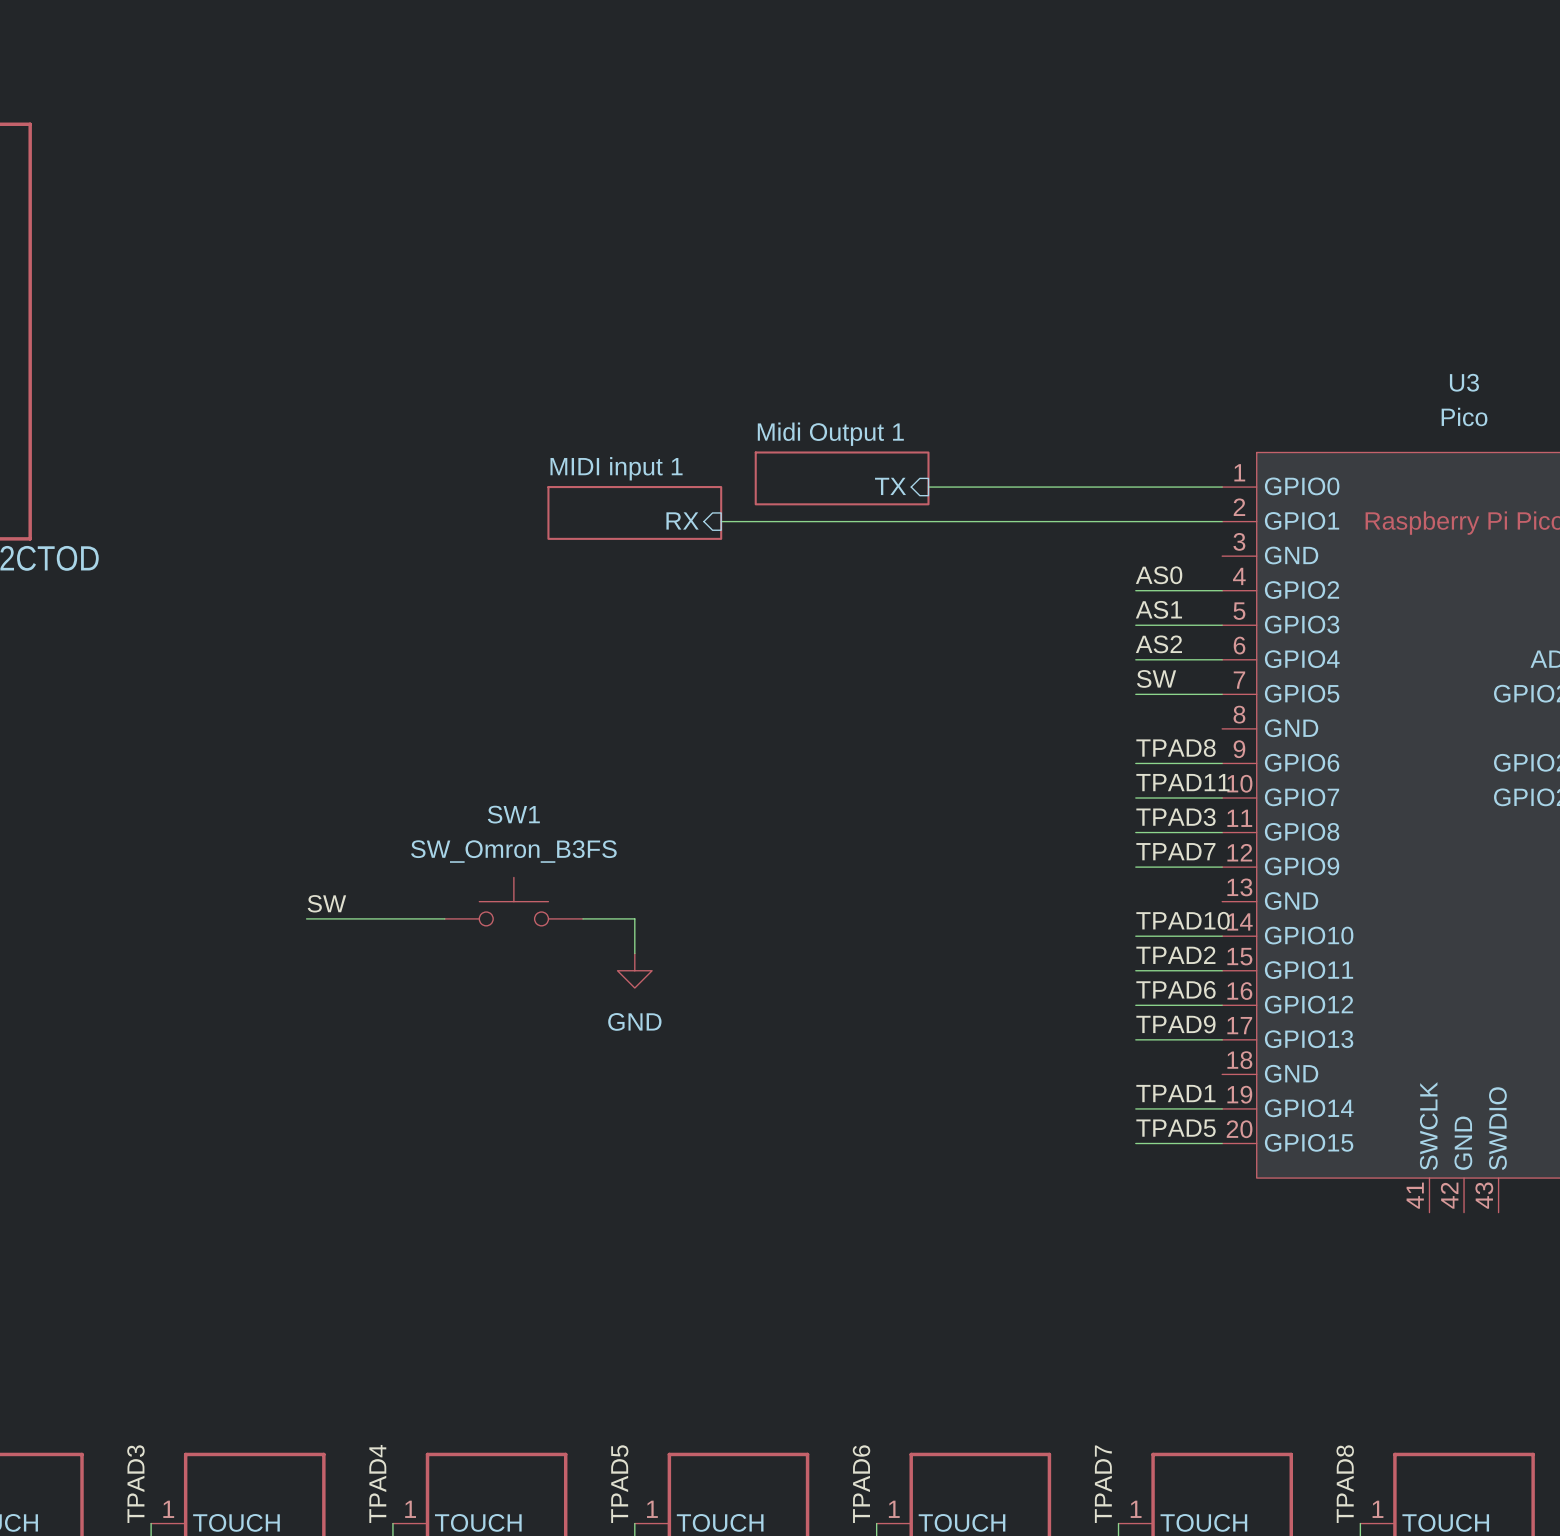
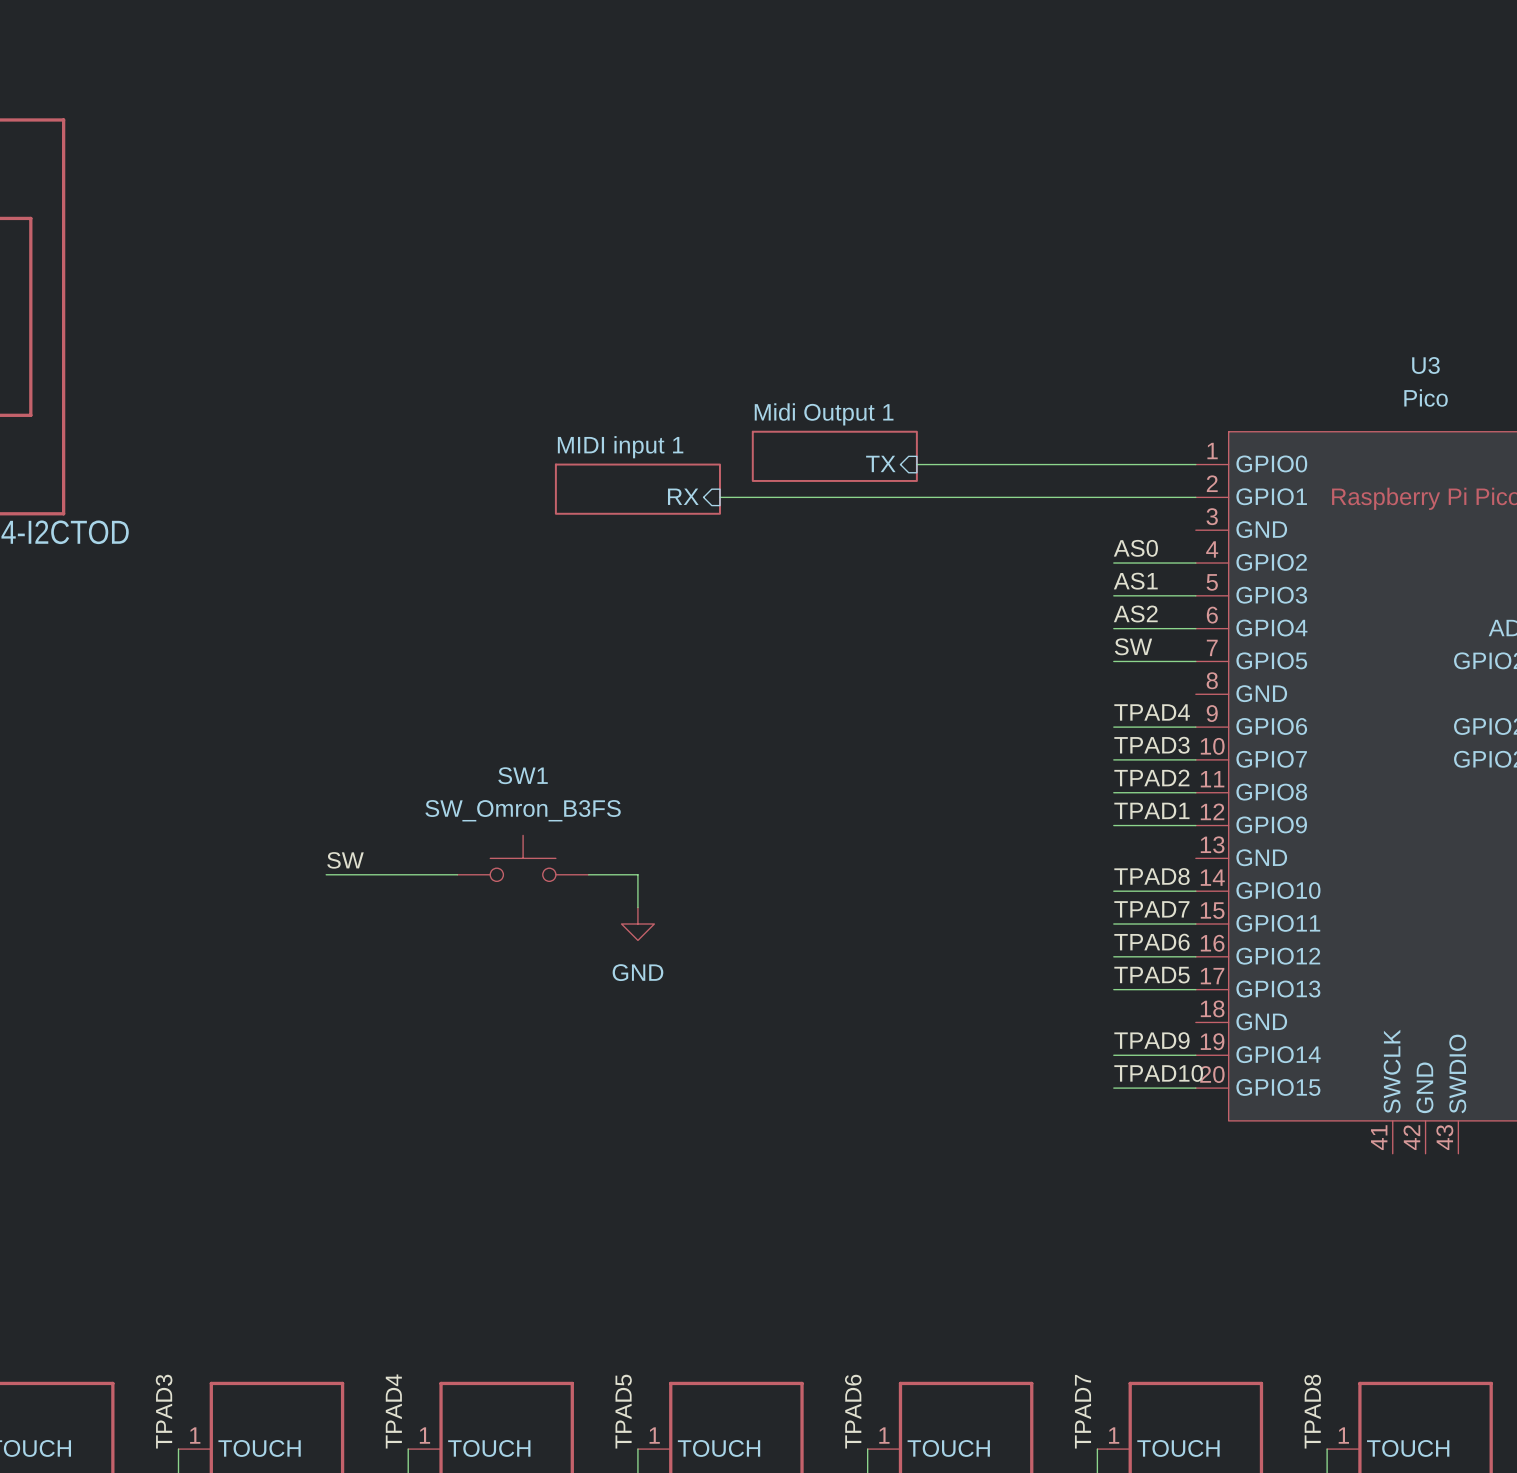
label: TPAD8 (1175, 748) -> TPAD4 (1152, 712)
label: TPAD11 (1182, 782) -> TPAD3 (1151, 745)
label: TPAD3 (1175, 817) -> TPAD2 (1151, 777)
label: TPAD7 (1175, 851) -> TPAD1 (1151, 810)
label: TPAD10 (1183, 920) -> TPAD8 (1151, 876)
label: TPAD2 (1175, 955) -> TPAD7 (1151, 909)
label: TPAD9 (1175, 1024) -> TPAD5 (1152, 975)
label: TPAD1 (1175, 1093) -> TPAD9 (1151, 1040)
label: TPAD5 (1176, 1128) -> TPAD10 (1158, 1073)

